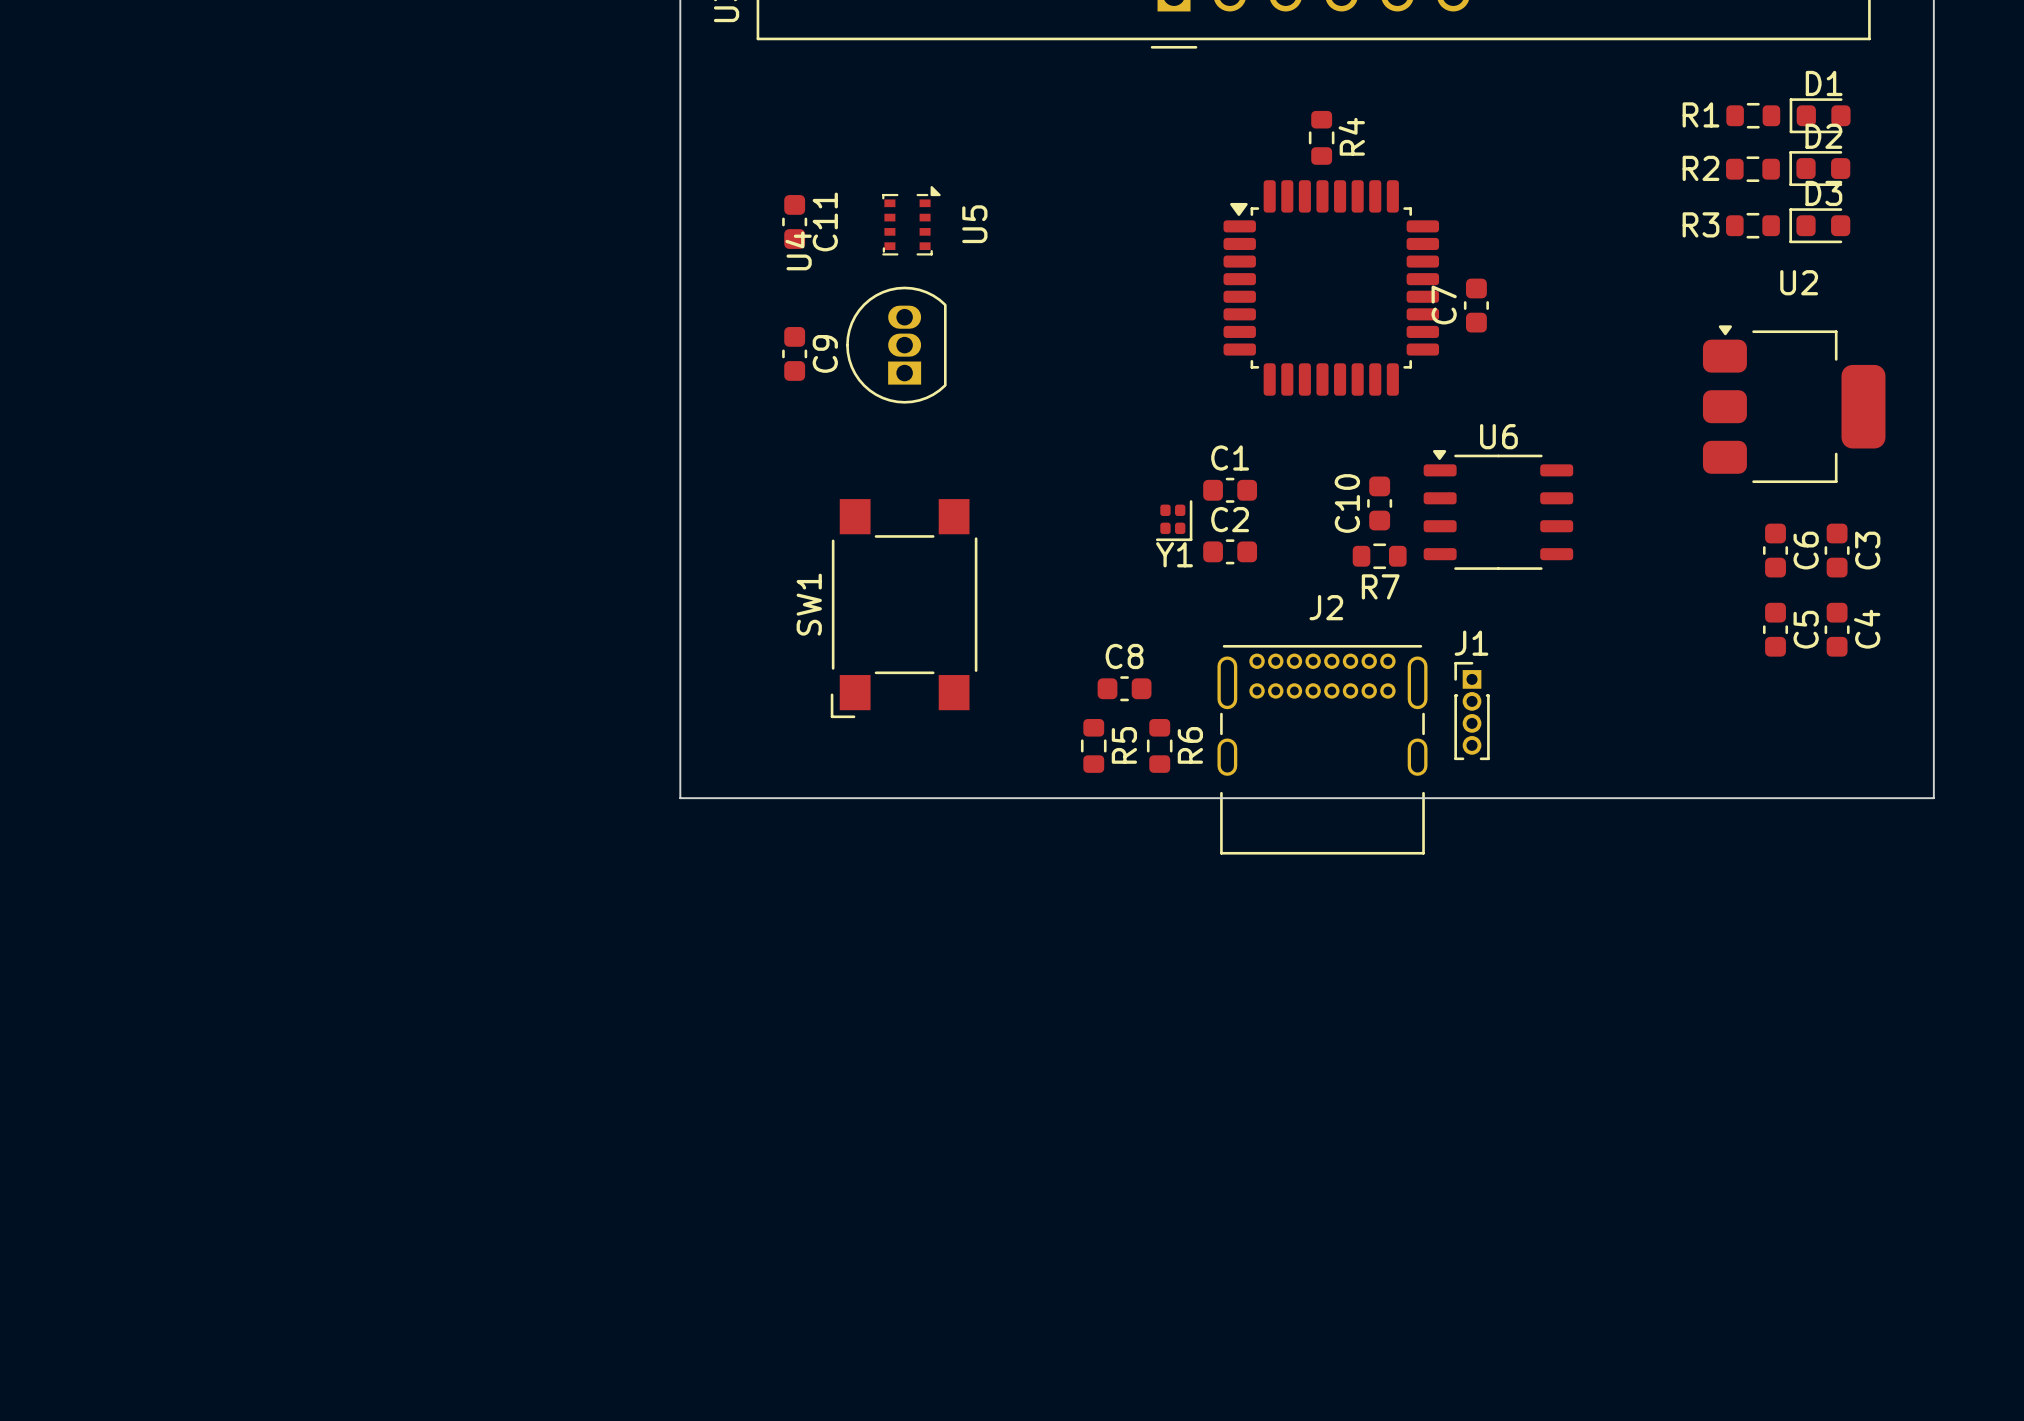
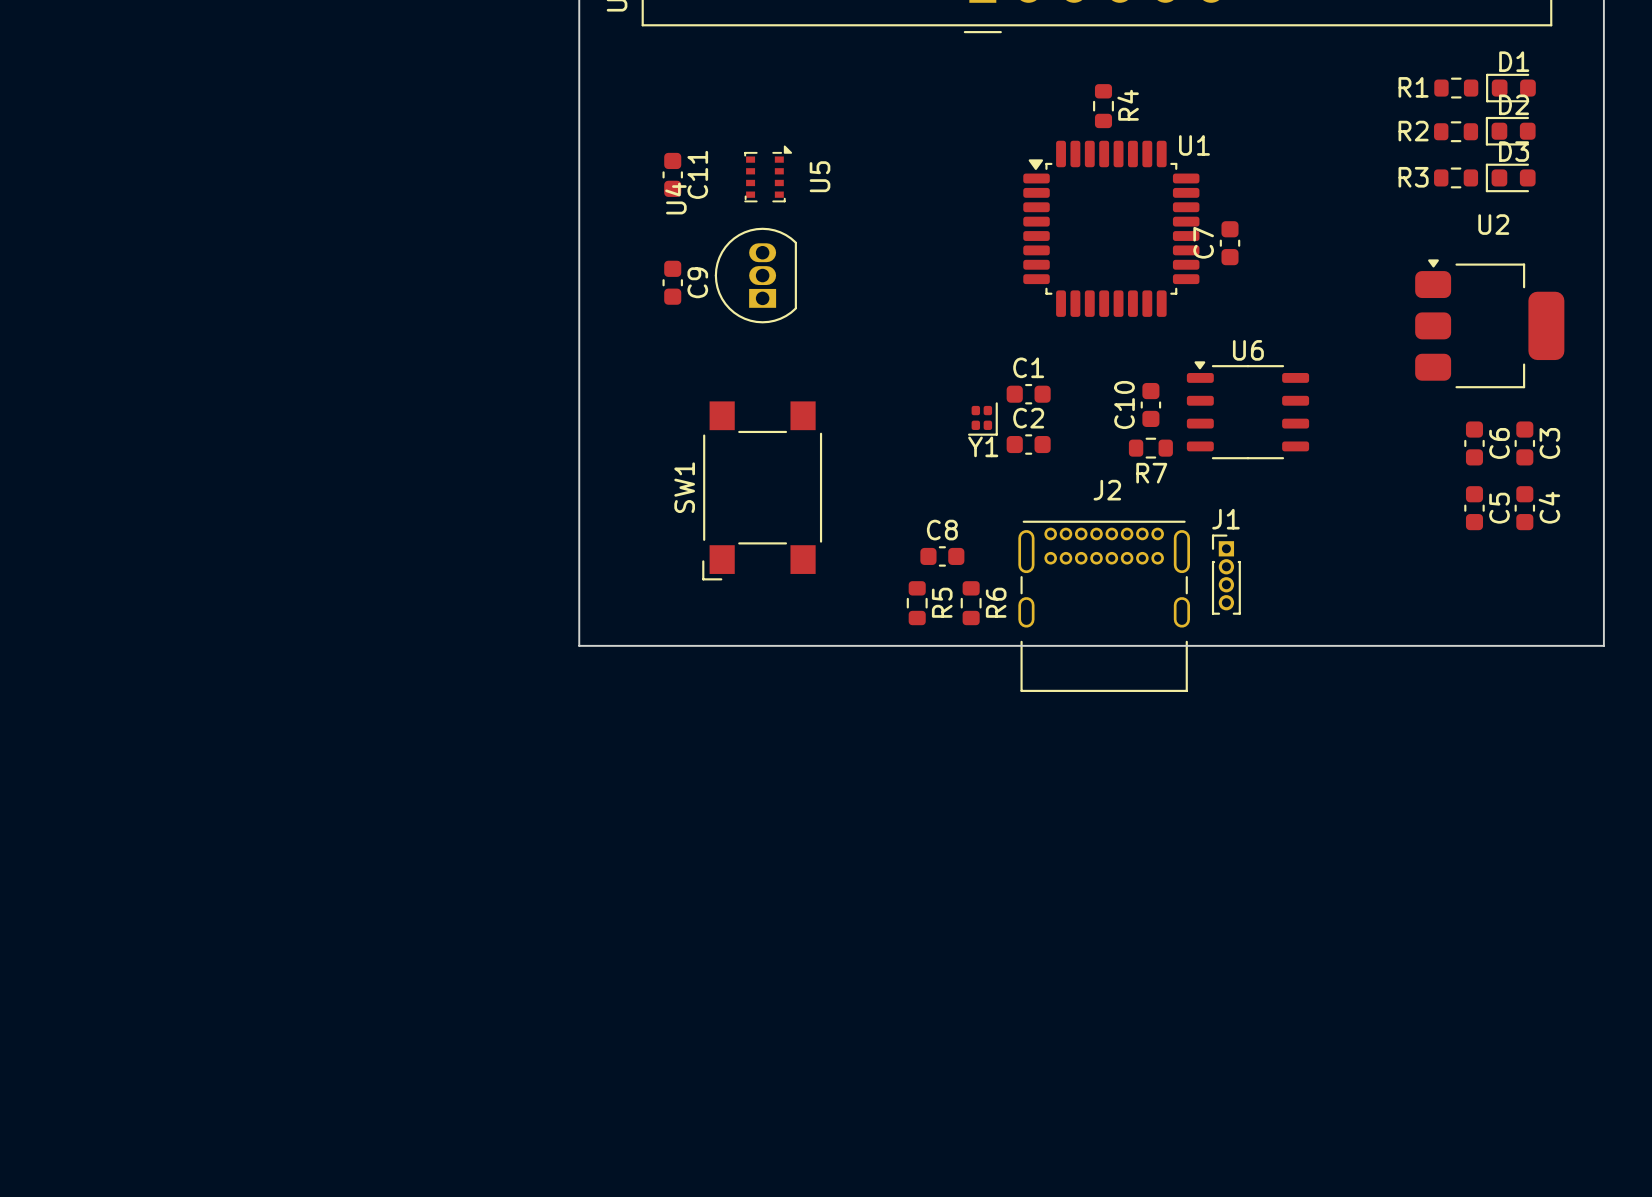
U1 name: none -> U1 (1194, 145)

